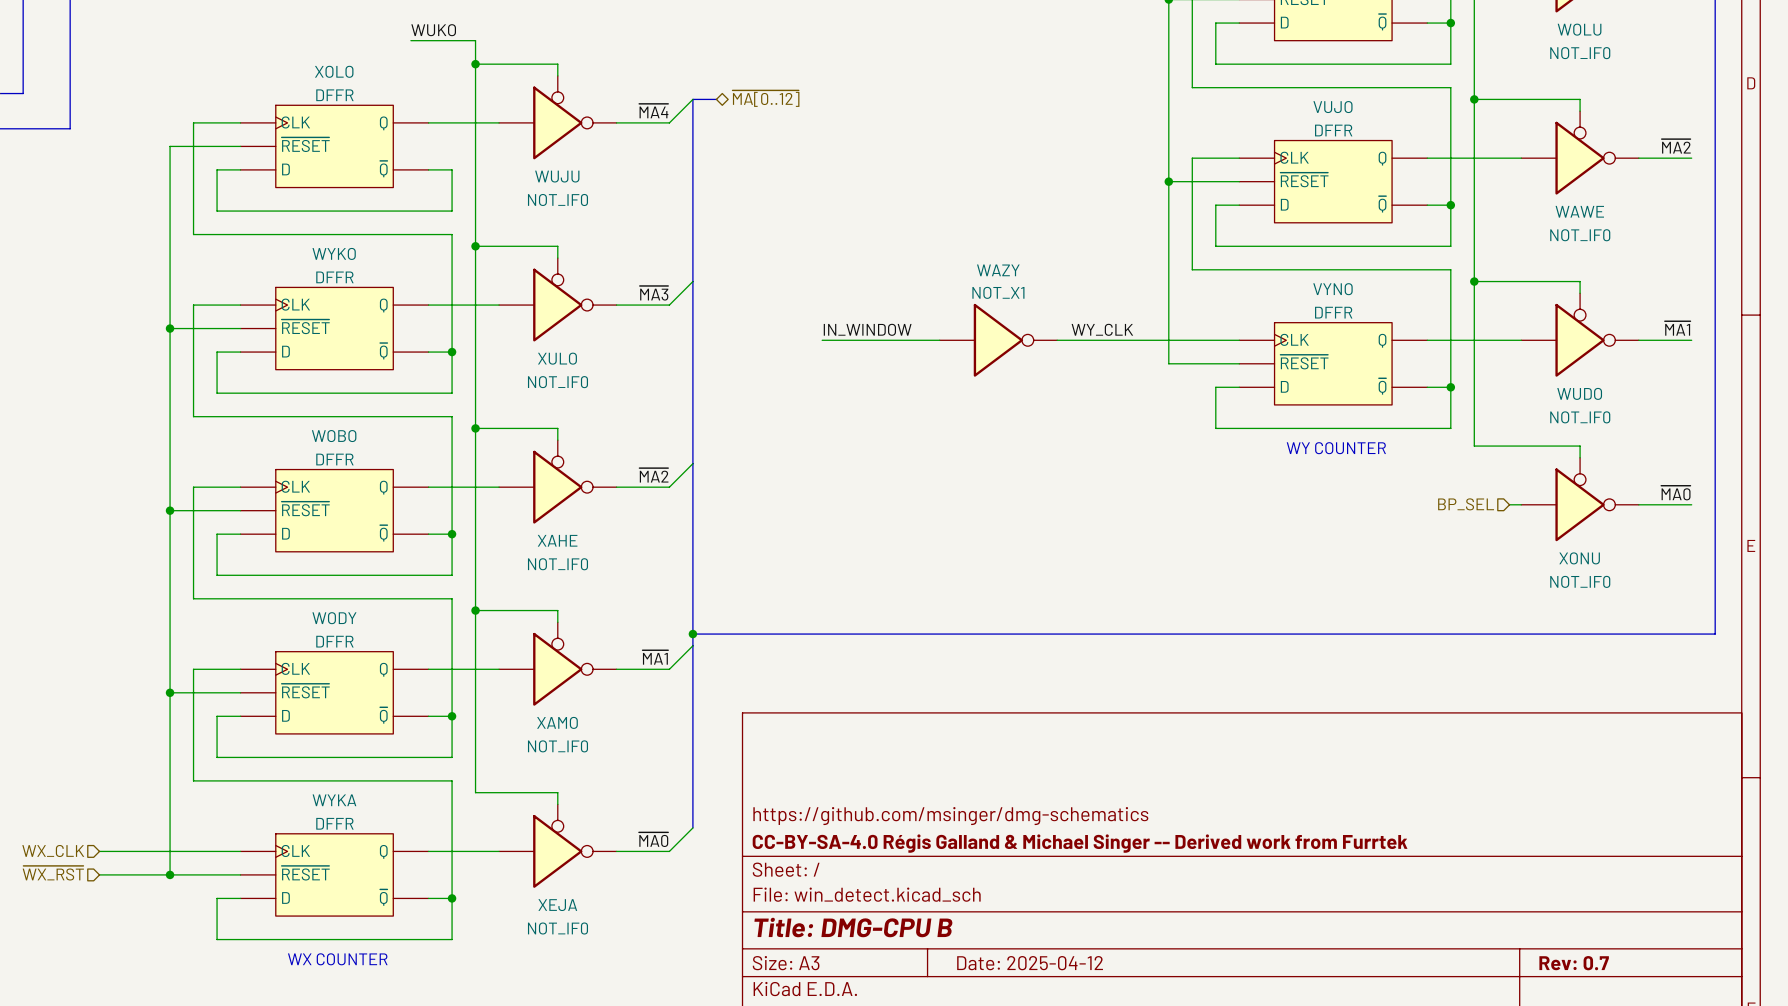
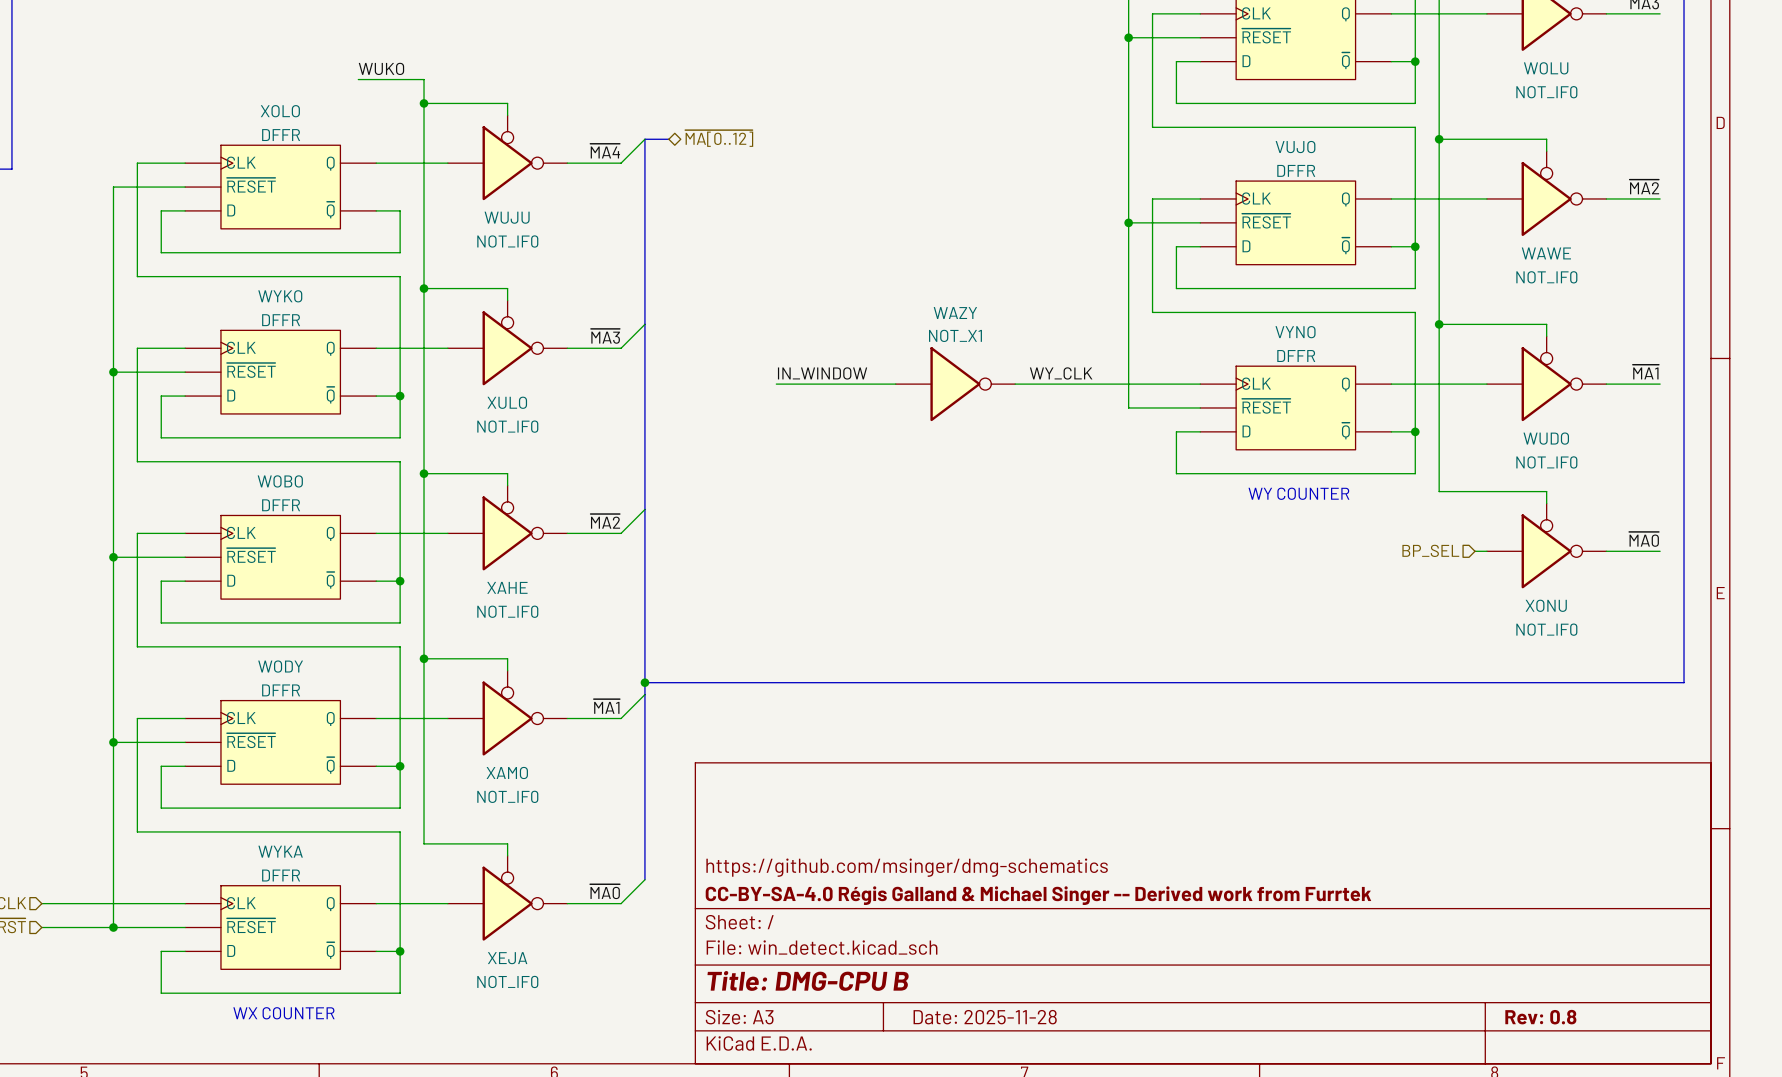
title block: Date: 2025-04-12 (1030, 963) -> Date: 2025-11-28 (985, 1017)
title block: Rev: 0.7 (1574, 963) -> Rev: 0.8 (1540, 1017)

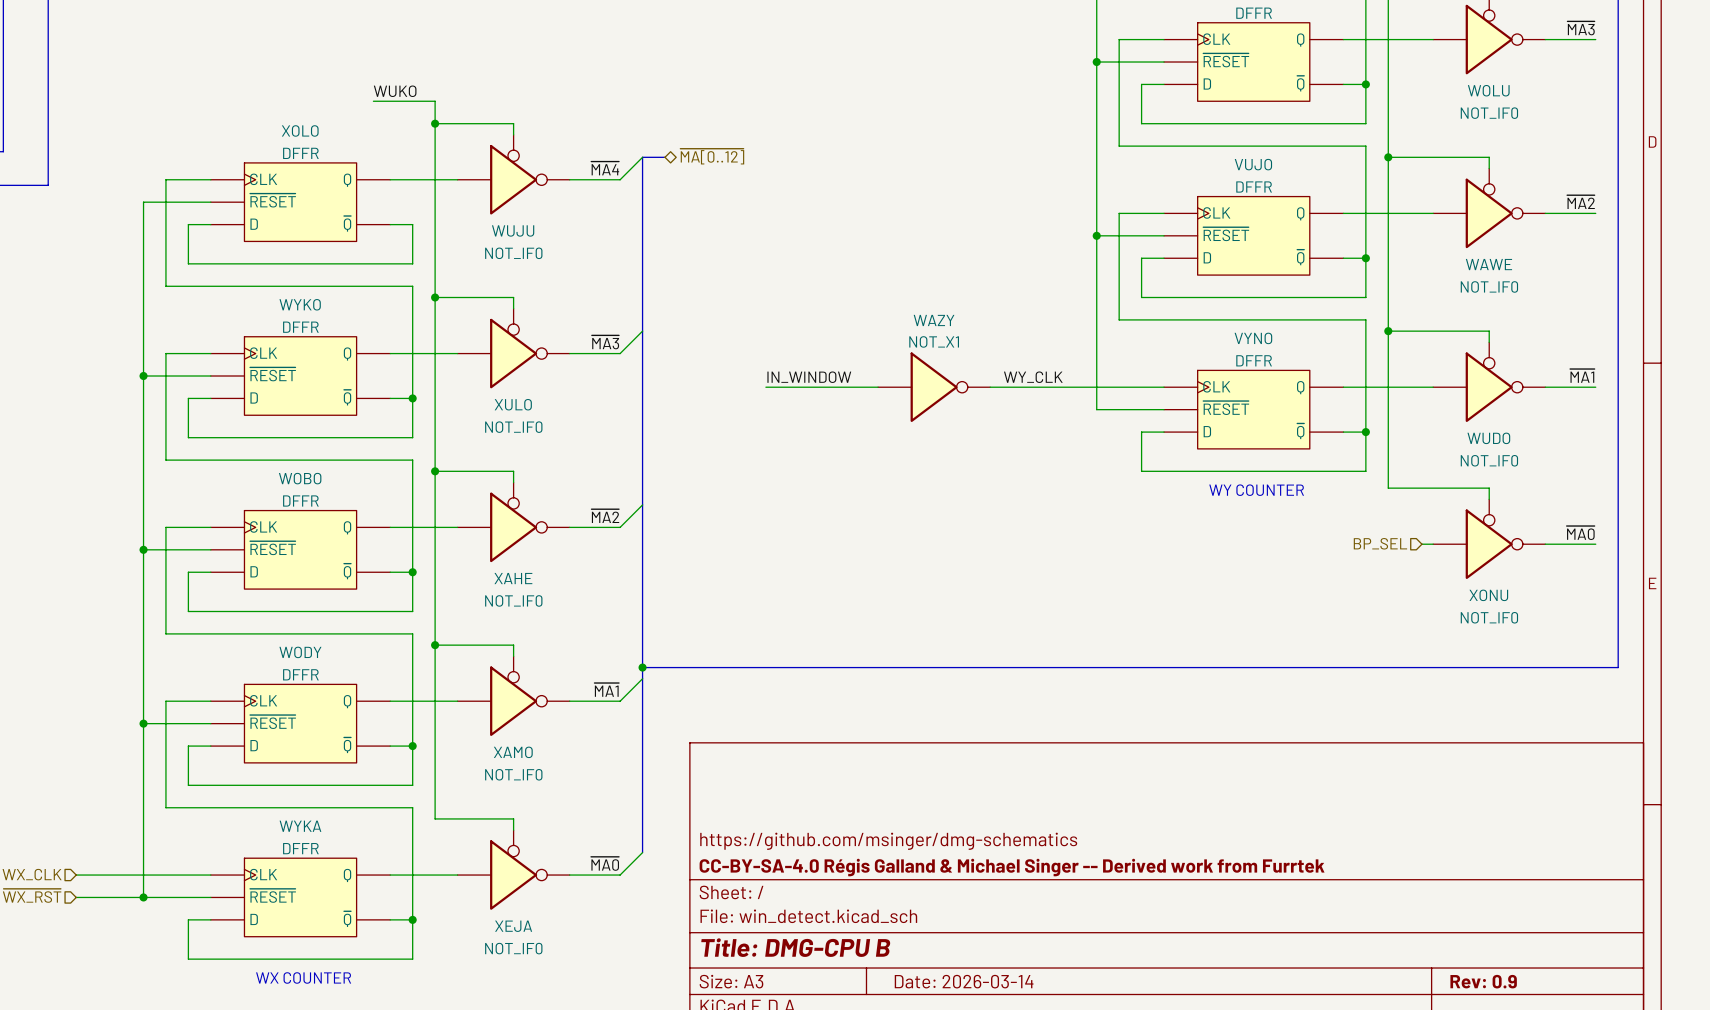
title block: Date: 2025-11-28 (985, 1017) -> Date: 2026-03-14 (964, 981)
title block: Rev: 0.8 (1540, 1017) -> Rev: 0.9 (1483, 981)

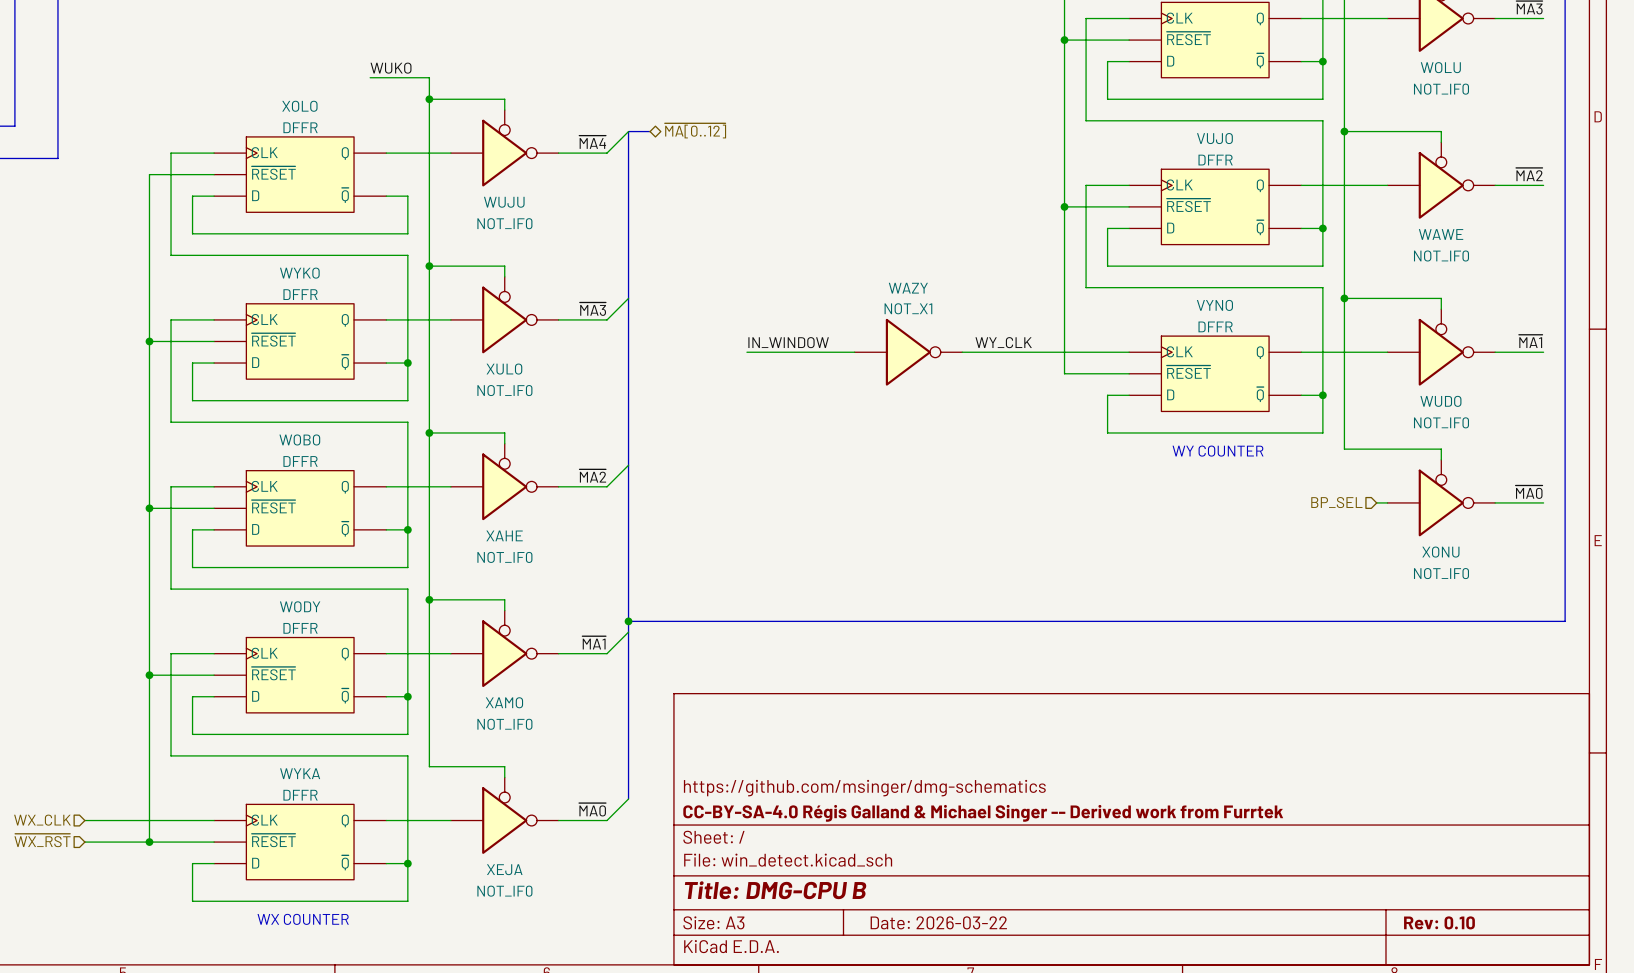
title block: Date: 2026-03-14 (964, 981) -> Date: 2026-03-22 (938, 922)
title block: Rev: 0.9 (1483, 981) -> Rev: 0.10 (1439, 922)

